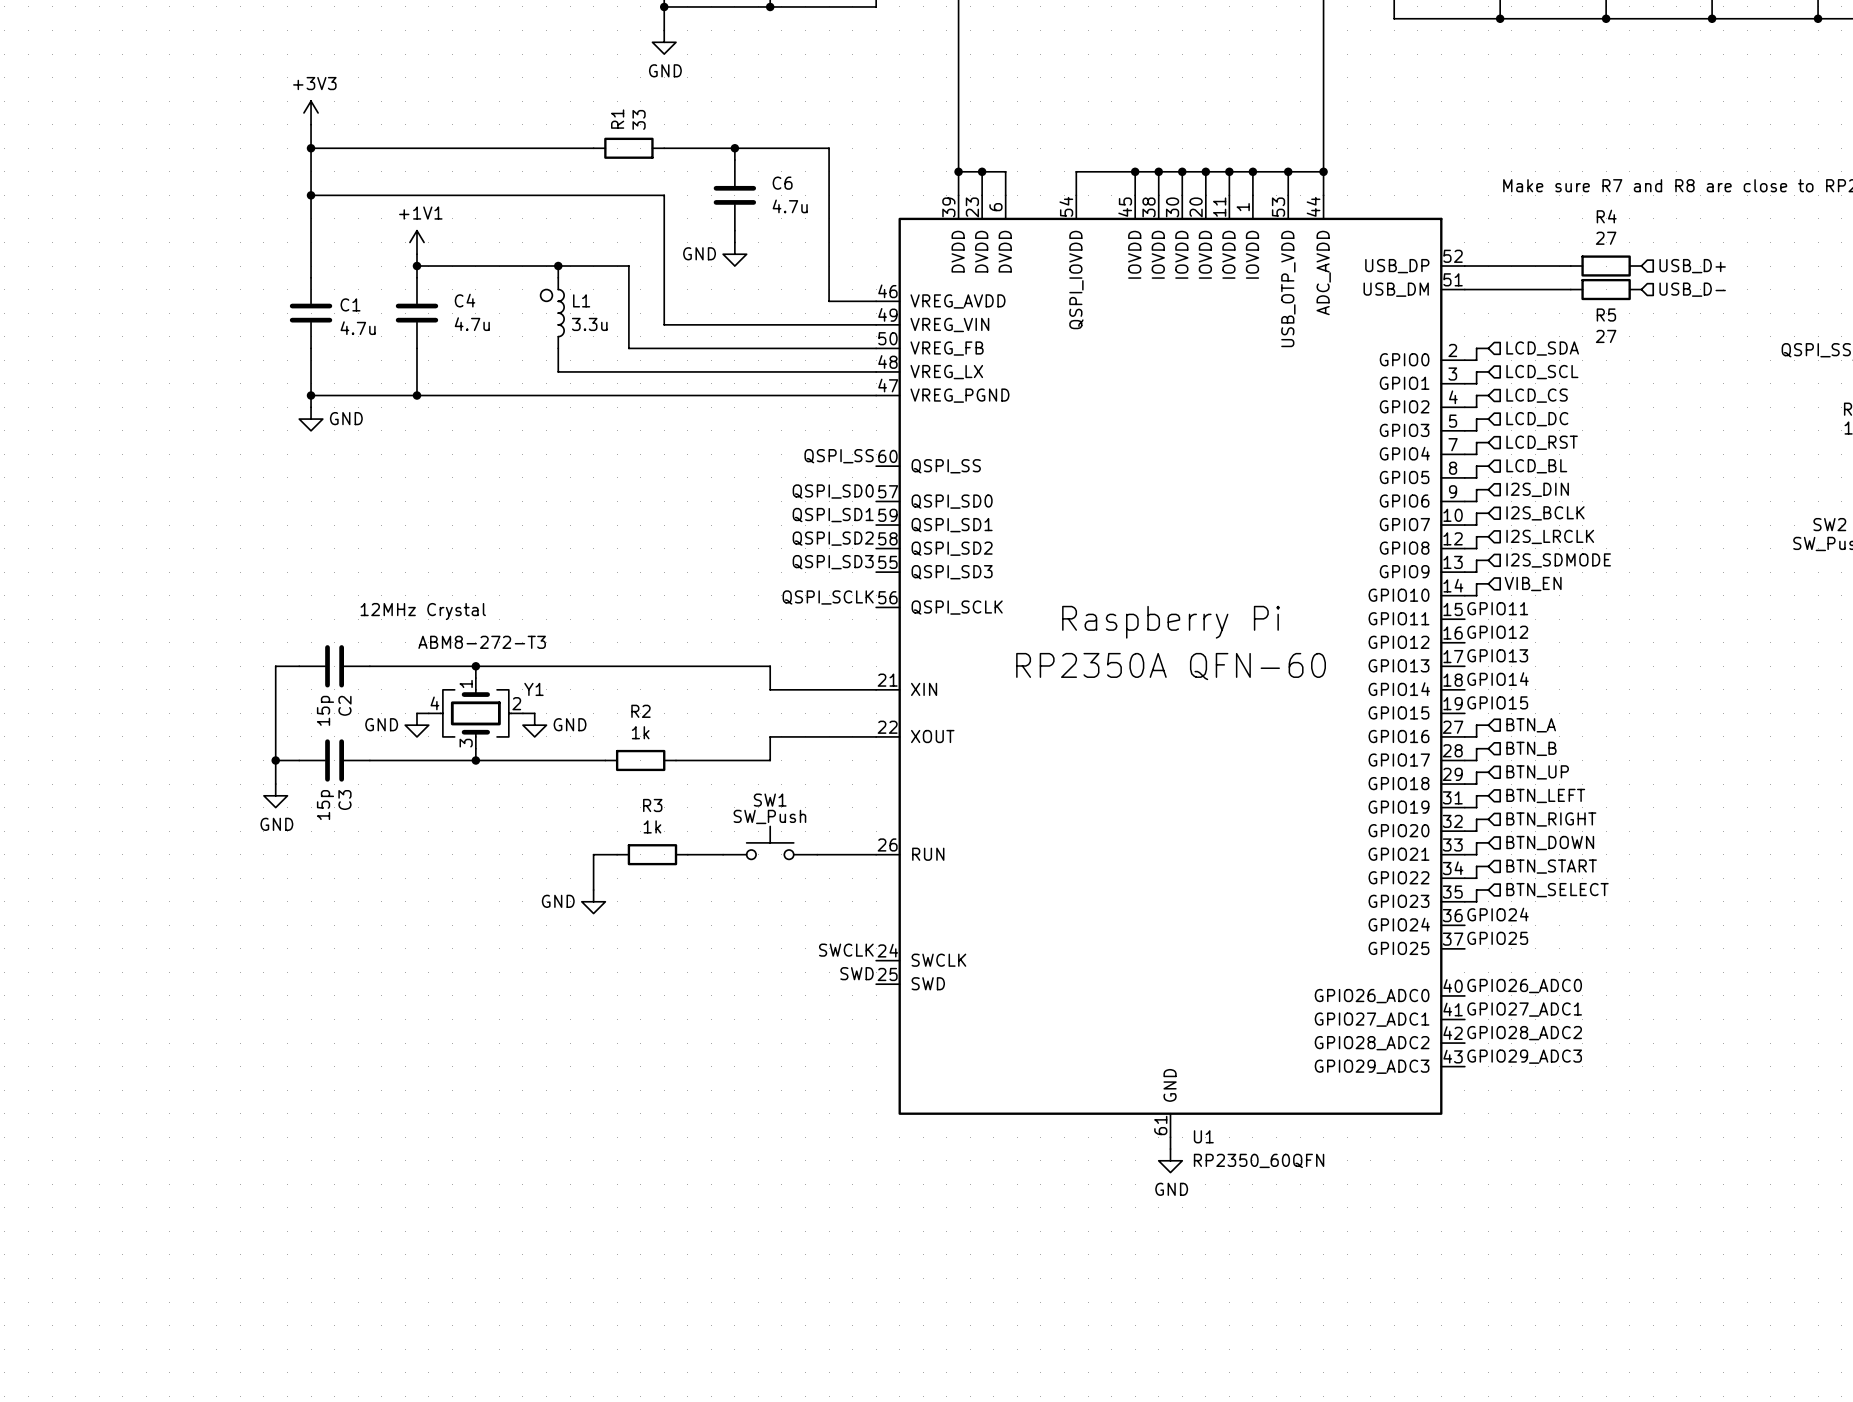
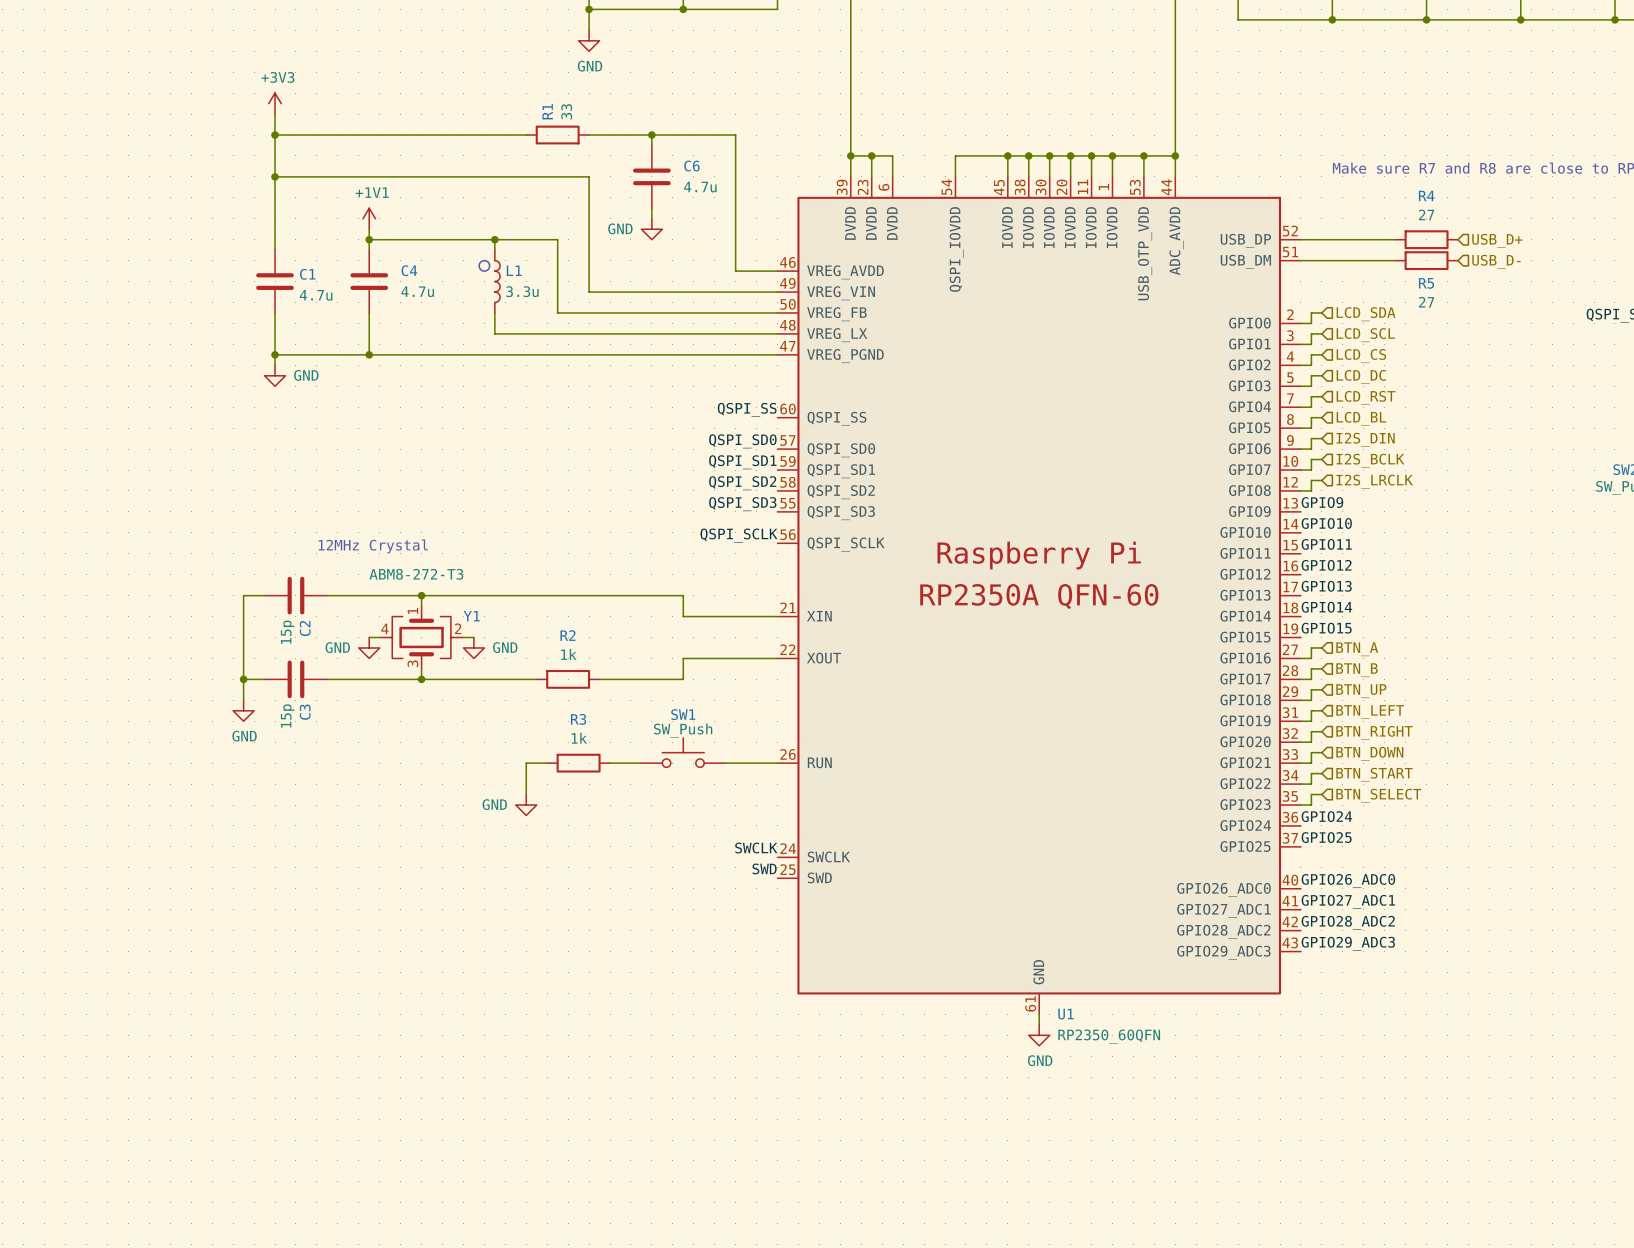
wire: (1488, 560) (1476, 560) (1476, 572) (1464, 572) -> none
hierarchical label: I2S_SDMODE (1558, 560) -> none
label: none -> GPIO9 (1322, 502)
wire: (1488, 583) (1476, 583) (1476, 595) (1464, 595) -> none
hierarchical label: VIB_EN (1533, 584) -> none
label: none -> GPIO10 (1326, 523)

